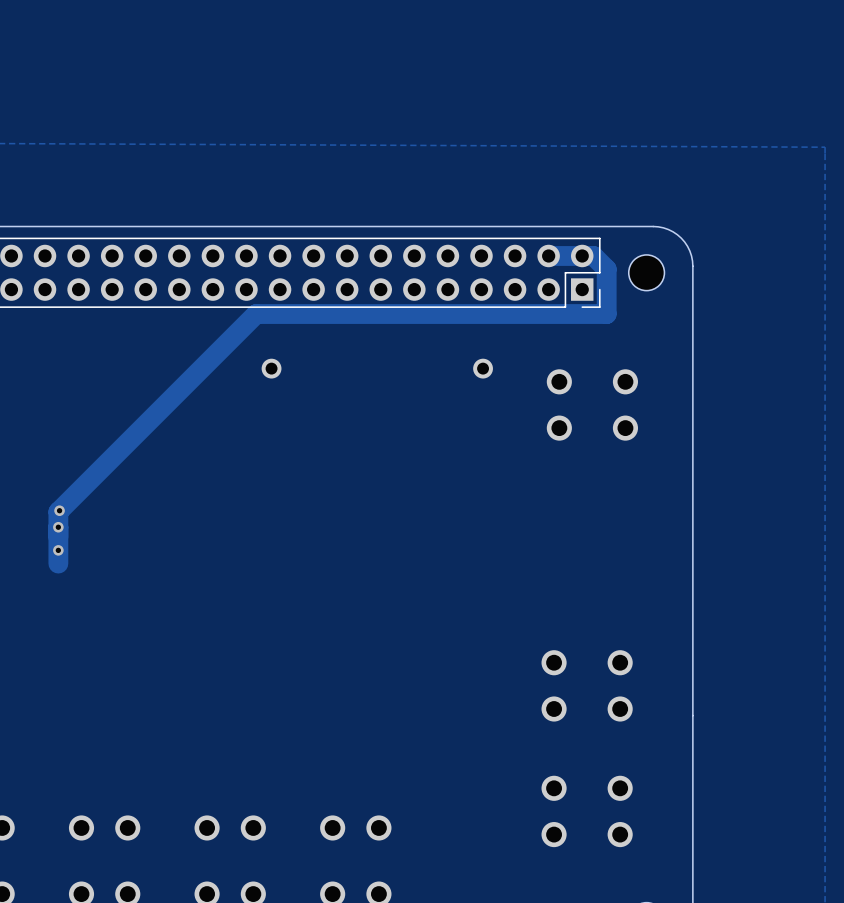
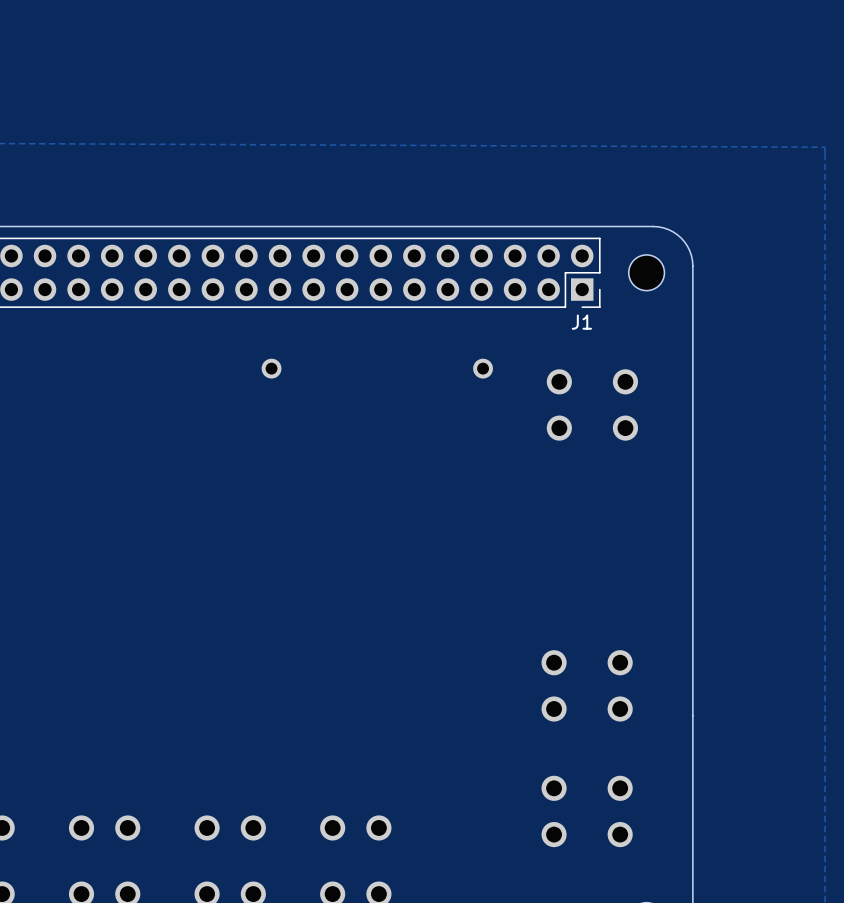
track: (548, 255) (593, 255) (606, 269) (606, 314) (256, 314) (58, 511) (58, 563) -> none
J1 name: none -> J1 (581, 322)
via: (59, 510) -> none
via: (58, 527) -> none
via: (58, 550) -> none

